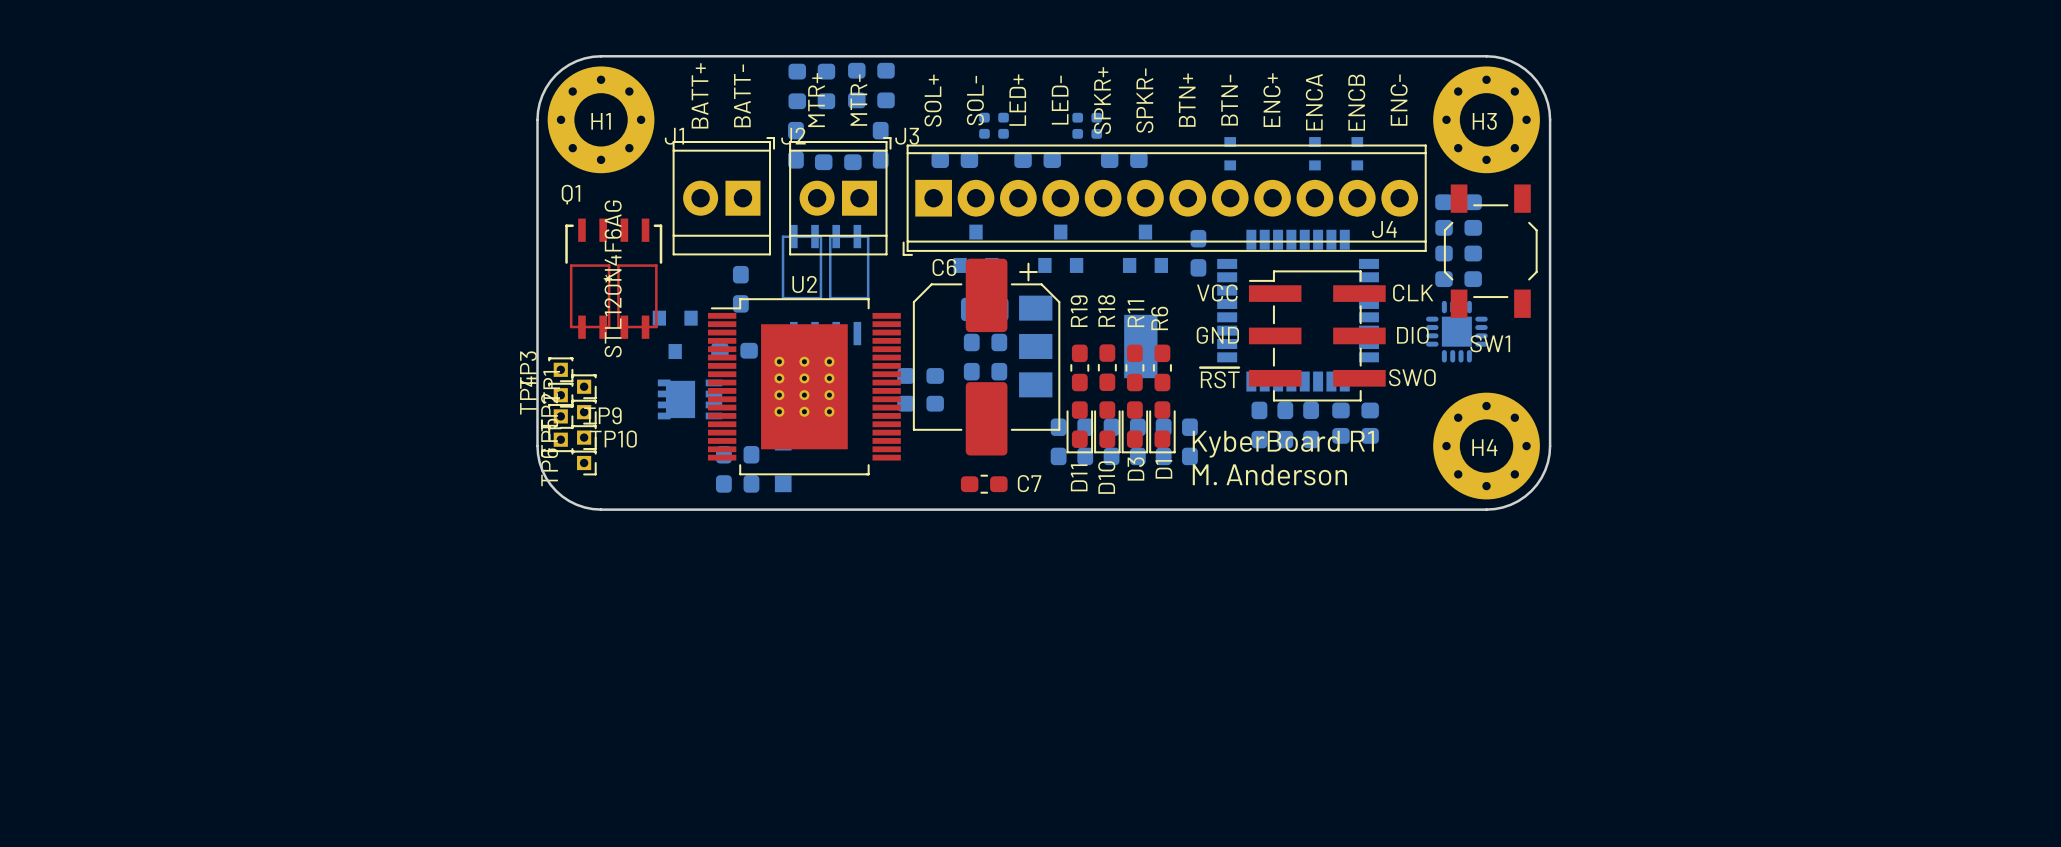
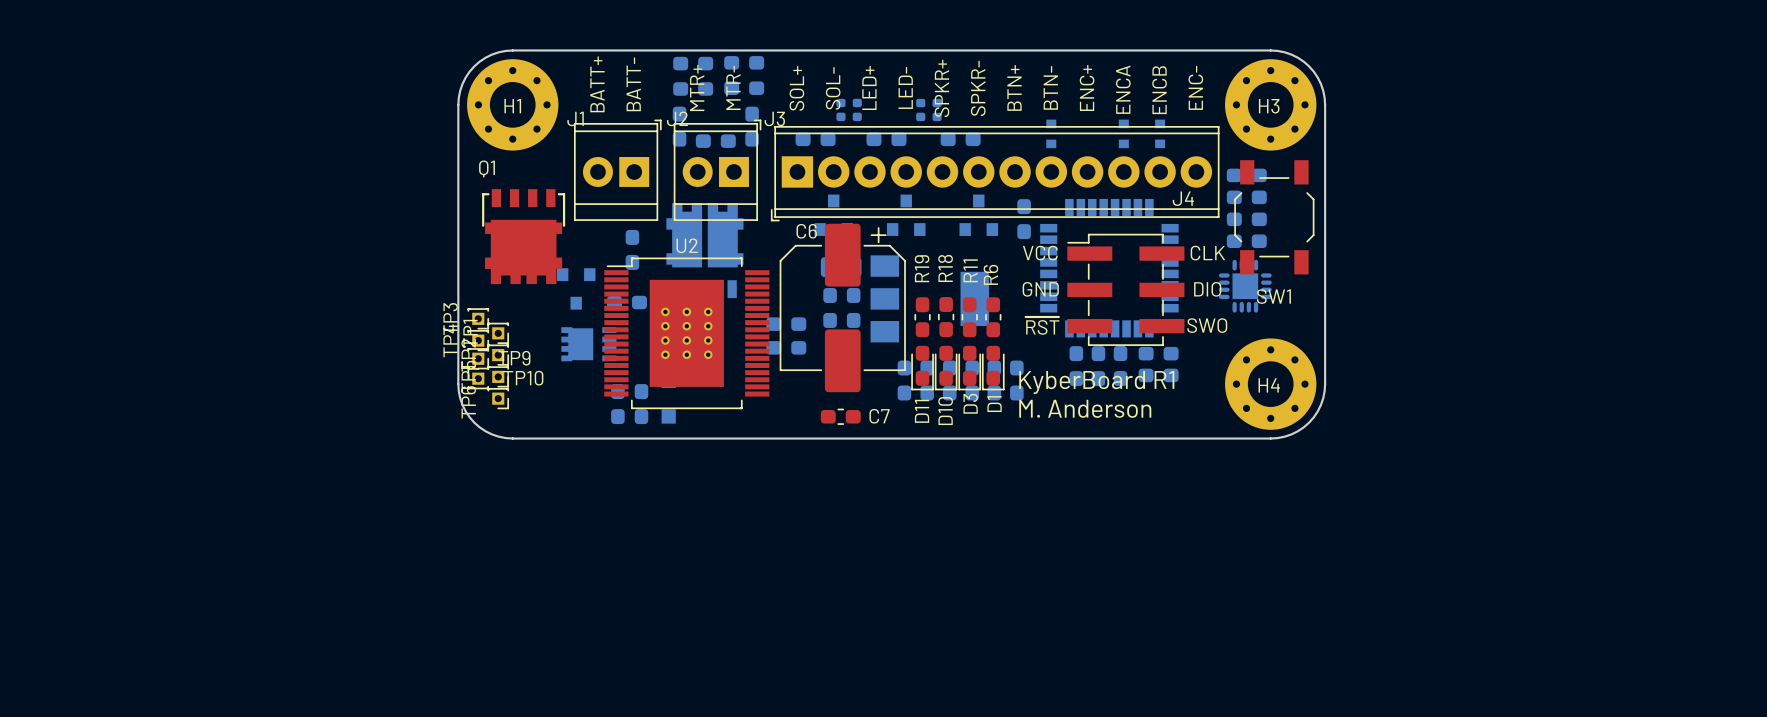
Q1 footprint: [565, 218, 663, 339] -> [482, 189, 566, 285]
part footprint: [781, 224, 870, 346] -> [666, 203, 744, 299]
Q1 value: STL120N4F6AG (613, 278) -> none

